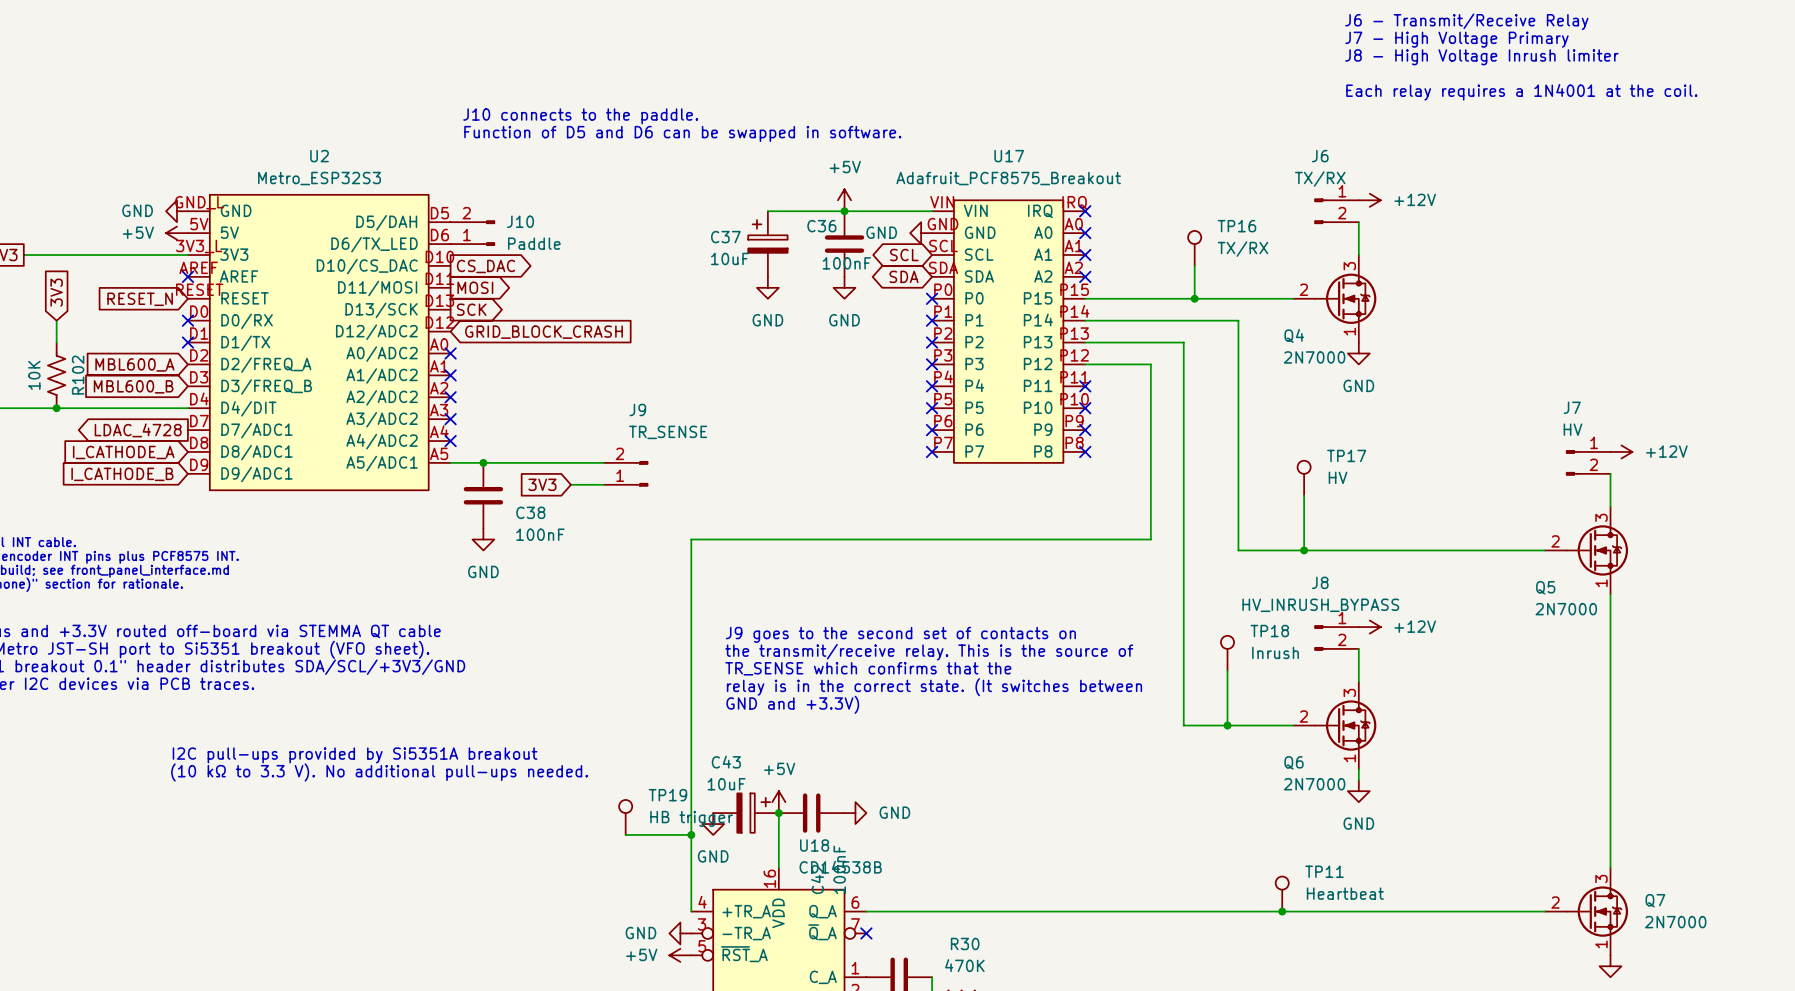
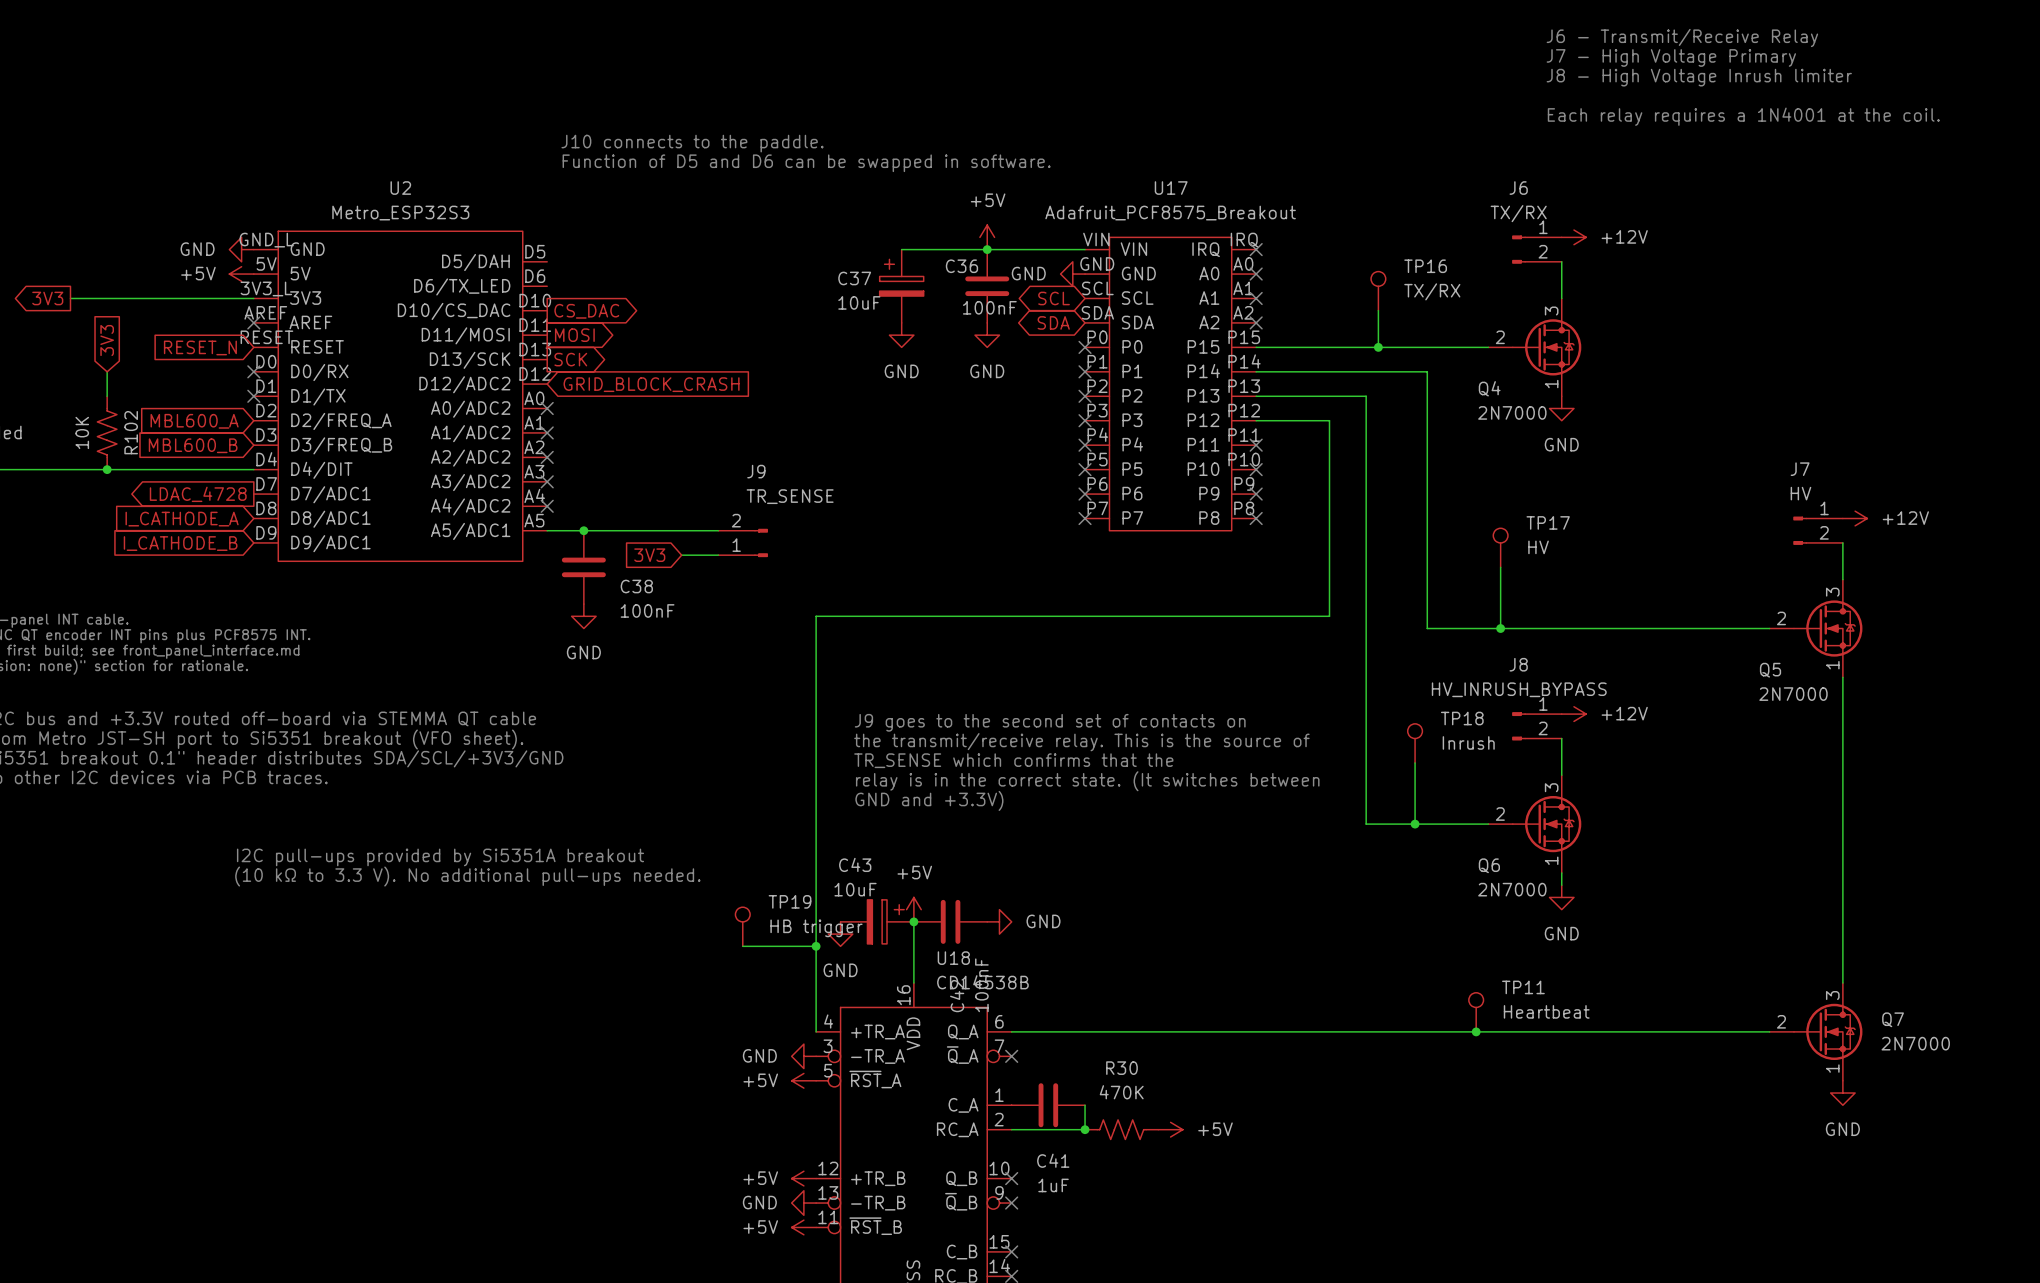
J10: Paddle (472, 233) -> none

